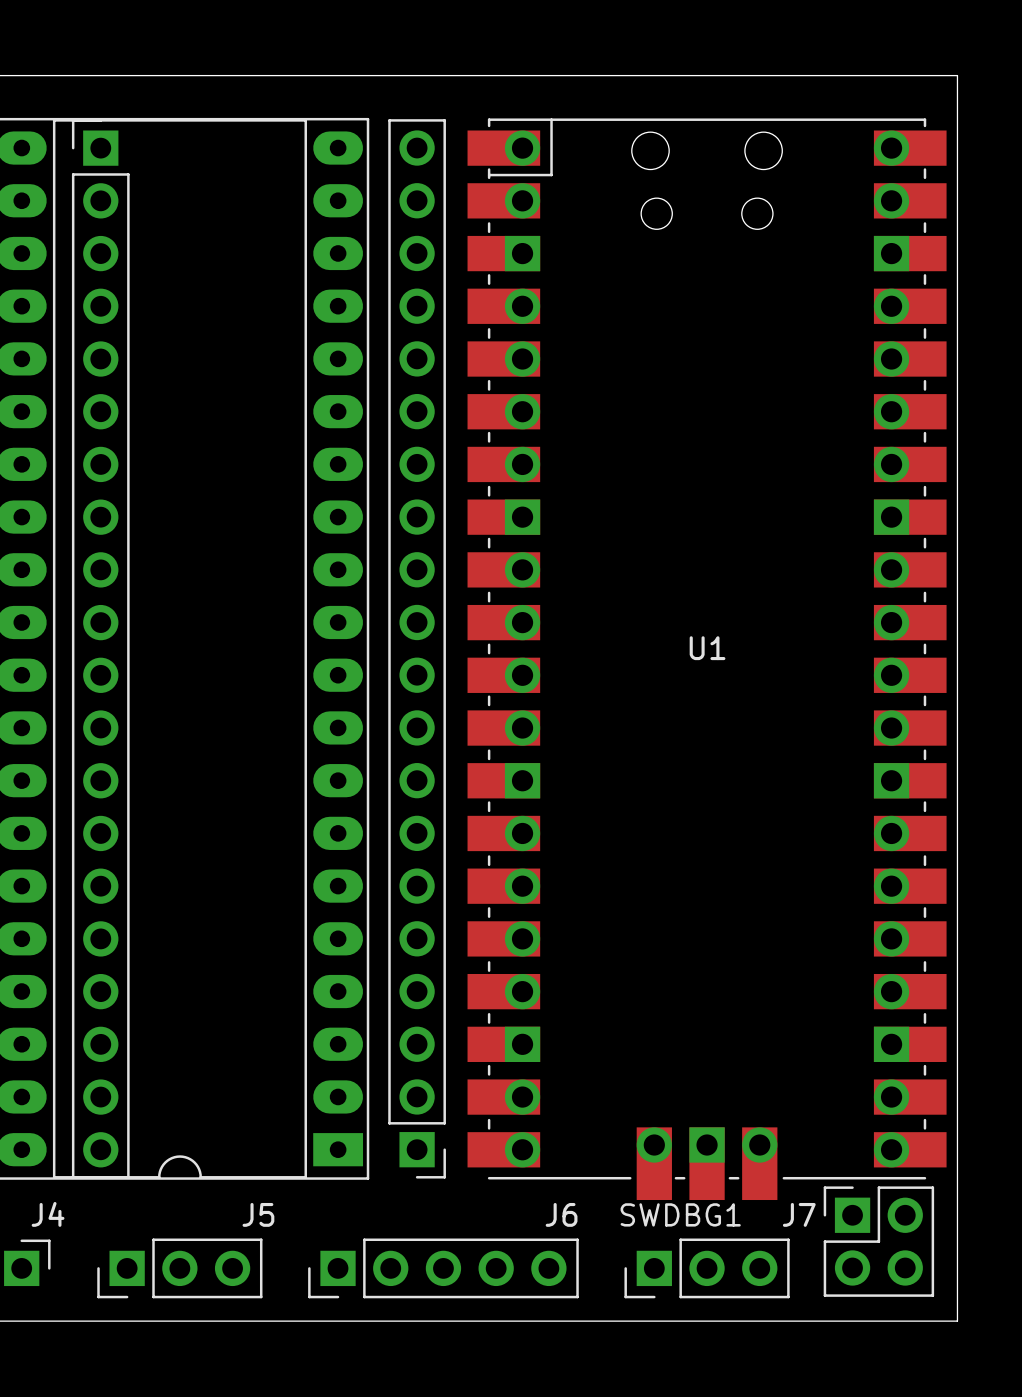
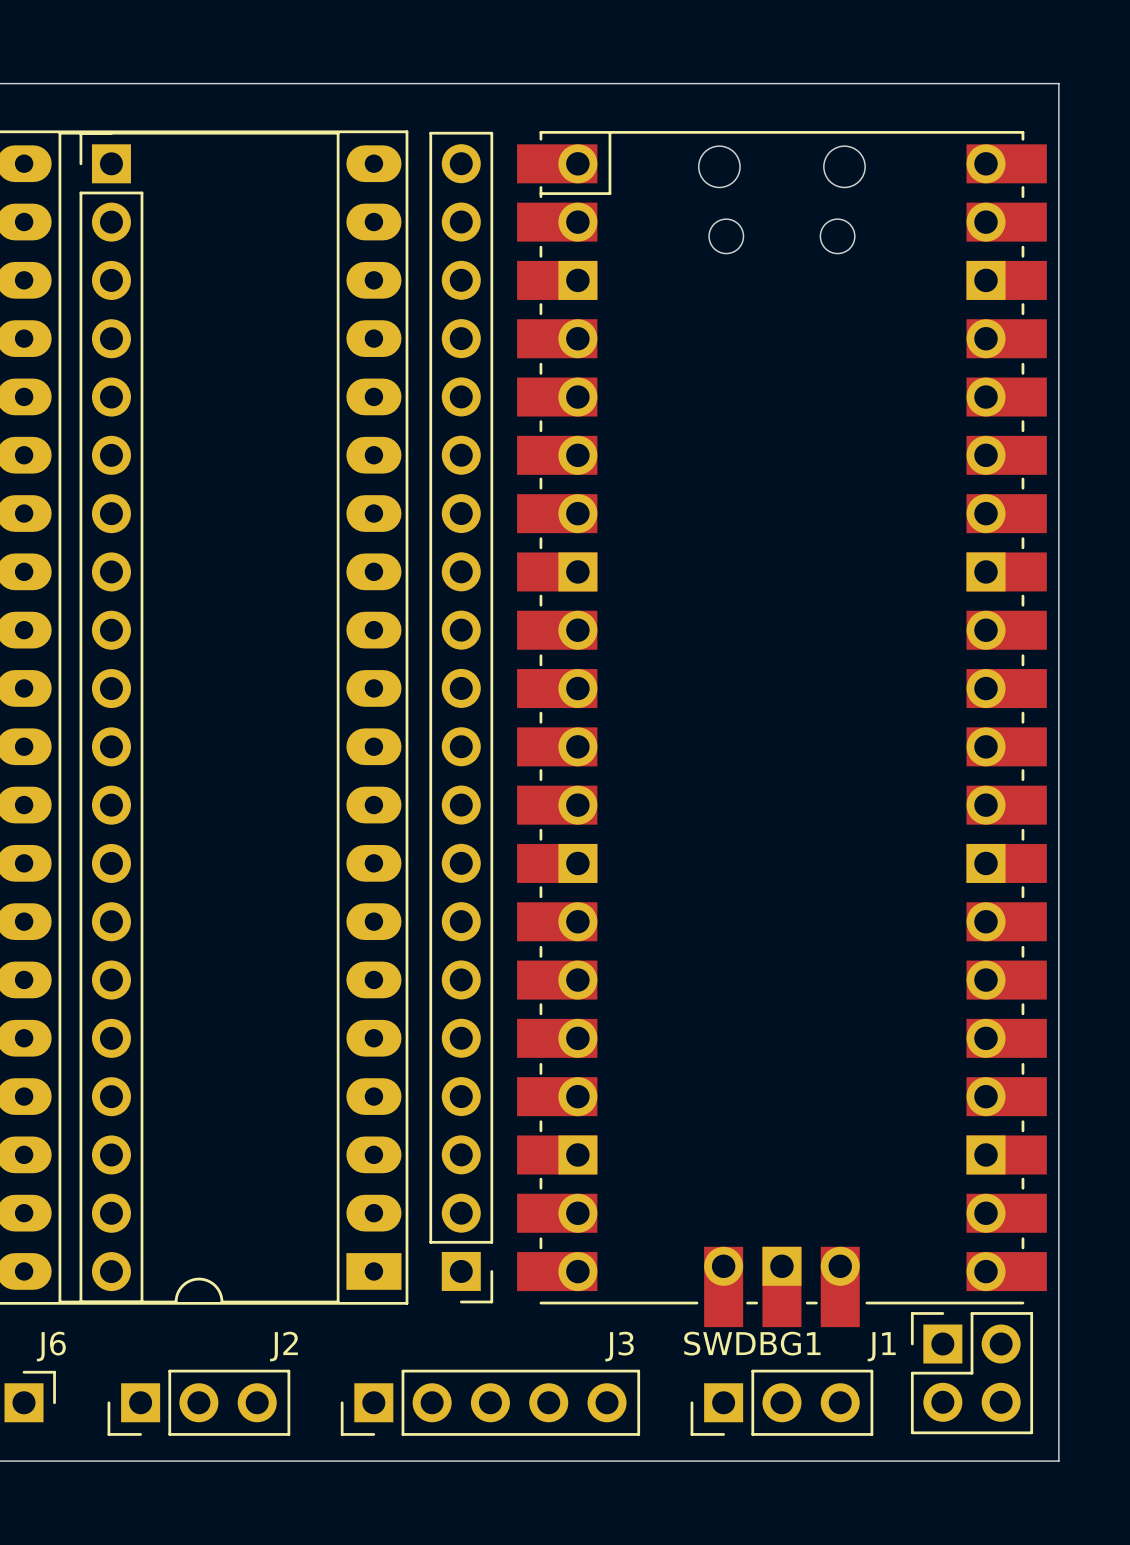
U1 name: U1 (707, 648) -> none
J4 name: J4 (48, 1214) -> J6 (51, 1346)
J5 name: J5 (258, 1214) -> J2 (283, 1346)
J6 name: J6 (561, 1214) -> J3 (619, 1346)
J7 name: J7 (799, 1214) -> J1 (881, 1346)

